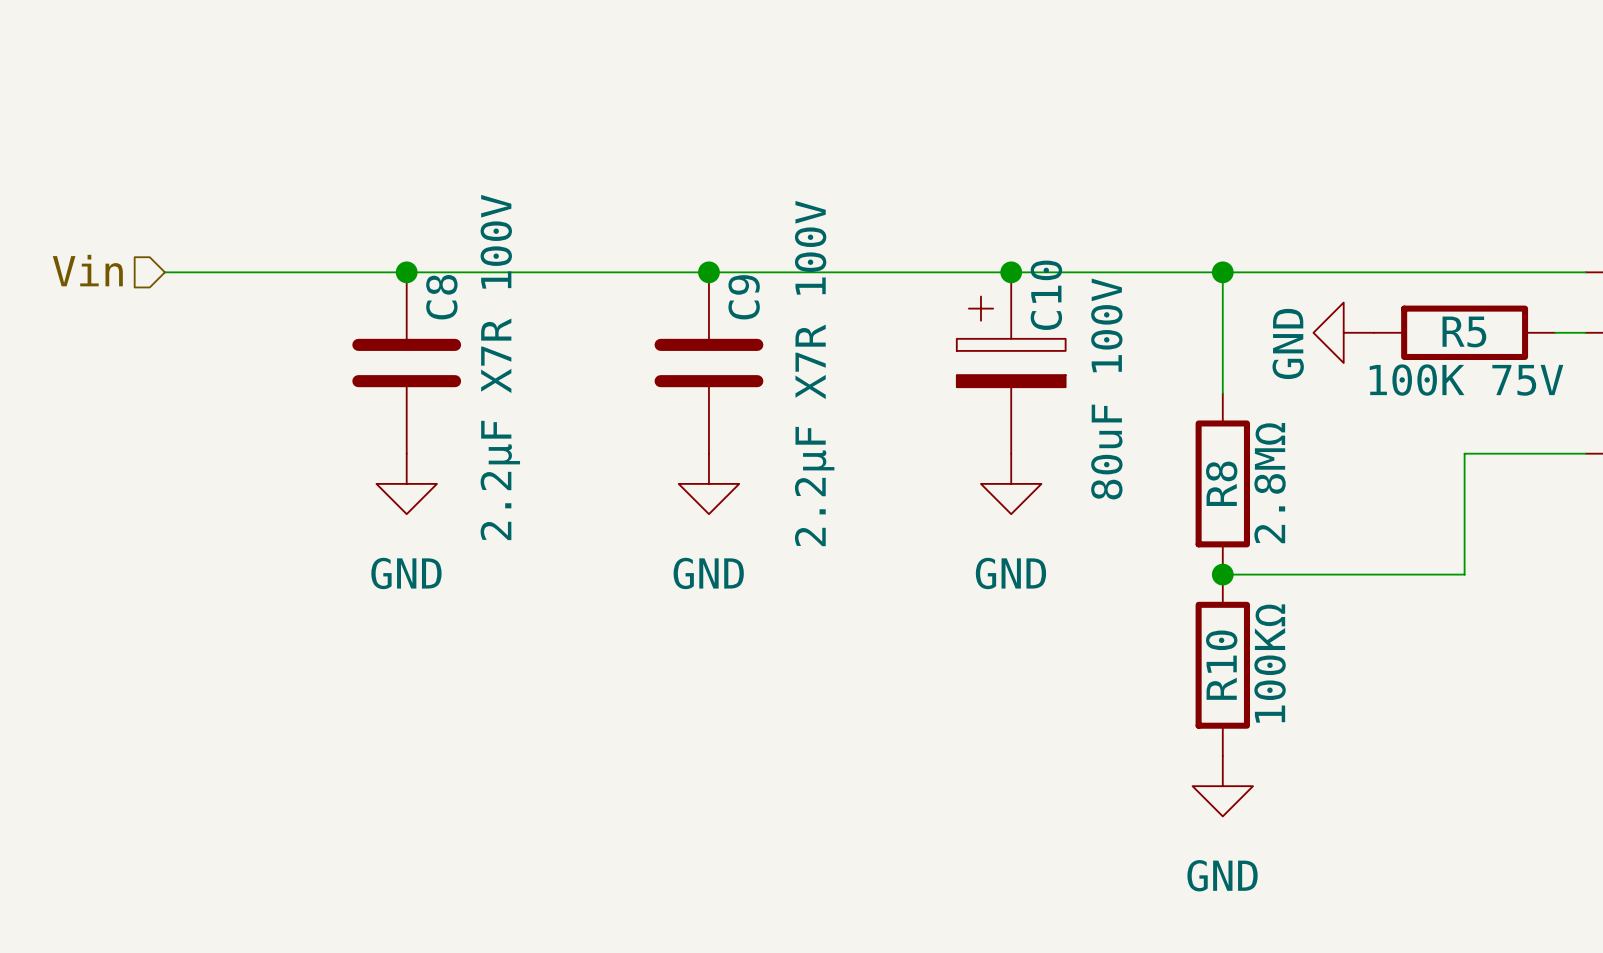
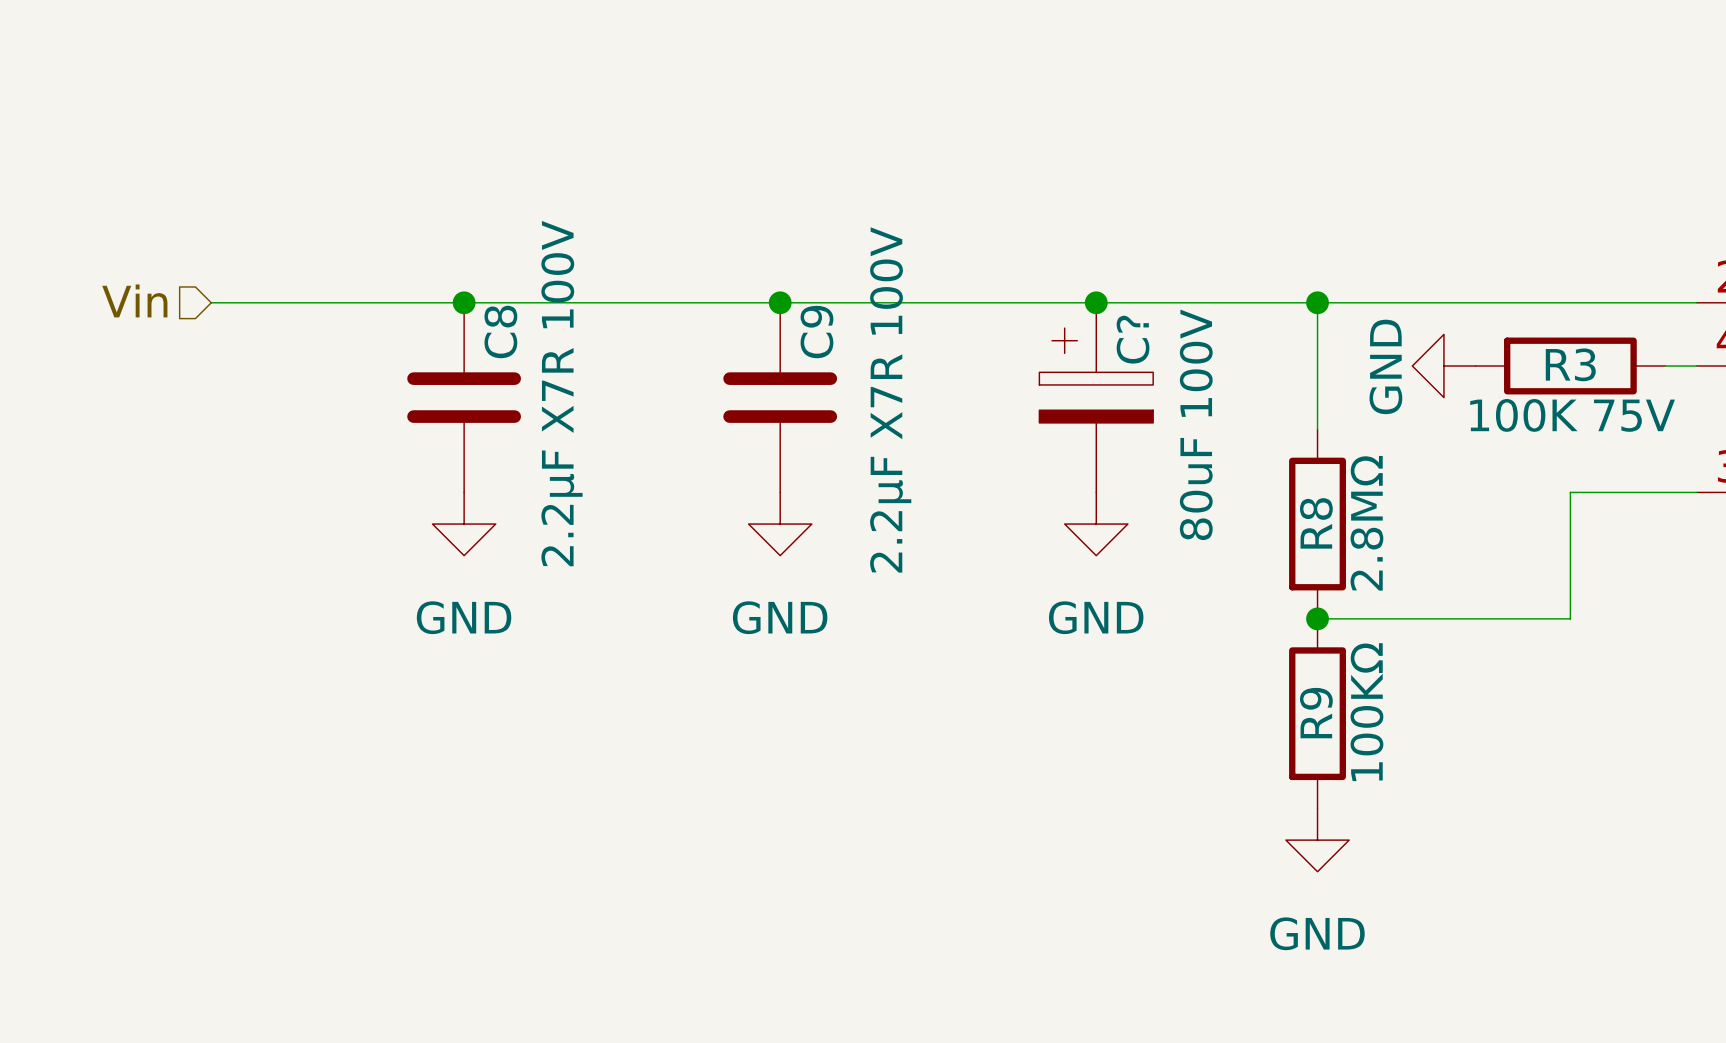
C10 name: C10 (1046, 295) -> C? (1133, 339)
R5 name: R5 (1464, 331) -> R3 (1570, 364)
R10 name: R10 (1221, 665) -> R9 (1316, 713)

